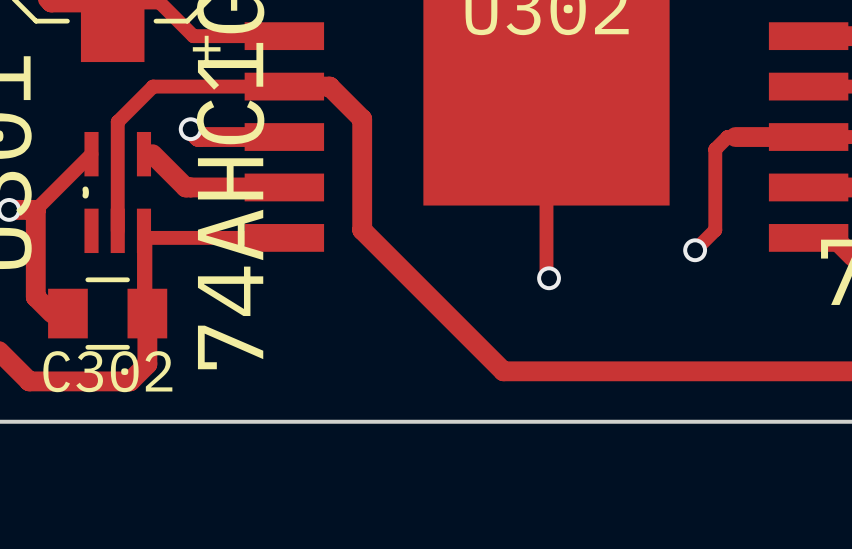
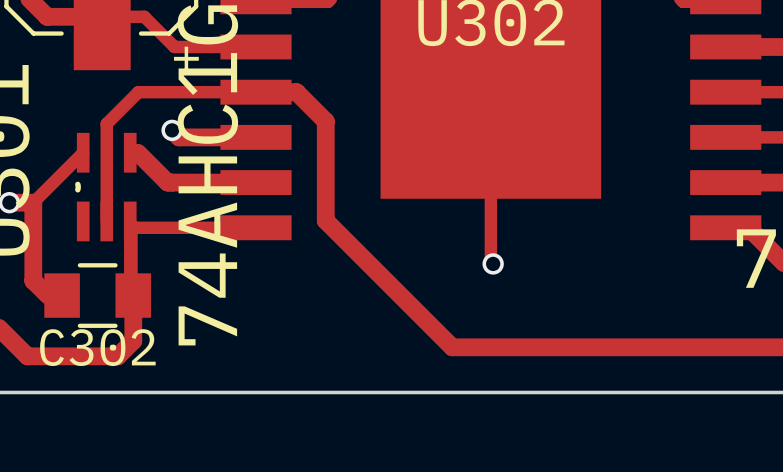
track: (808, 137) (727, 137) (715, 149) (715, 230) (695, 250) -> none
via: (695, 250) -> none

